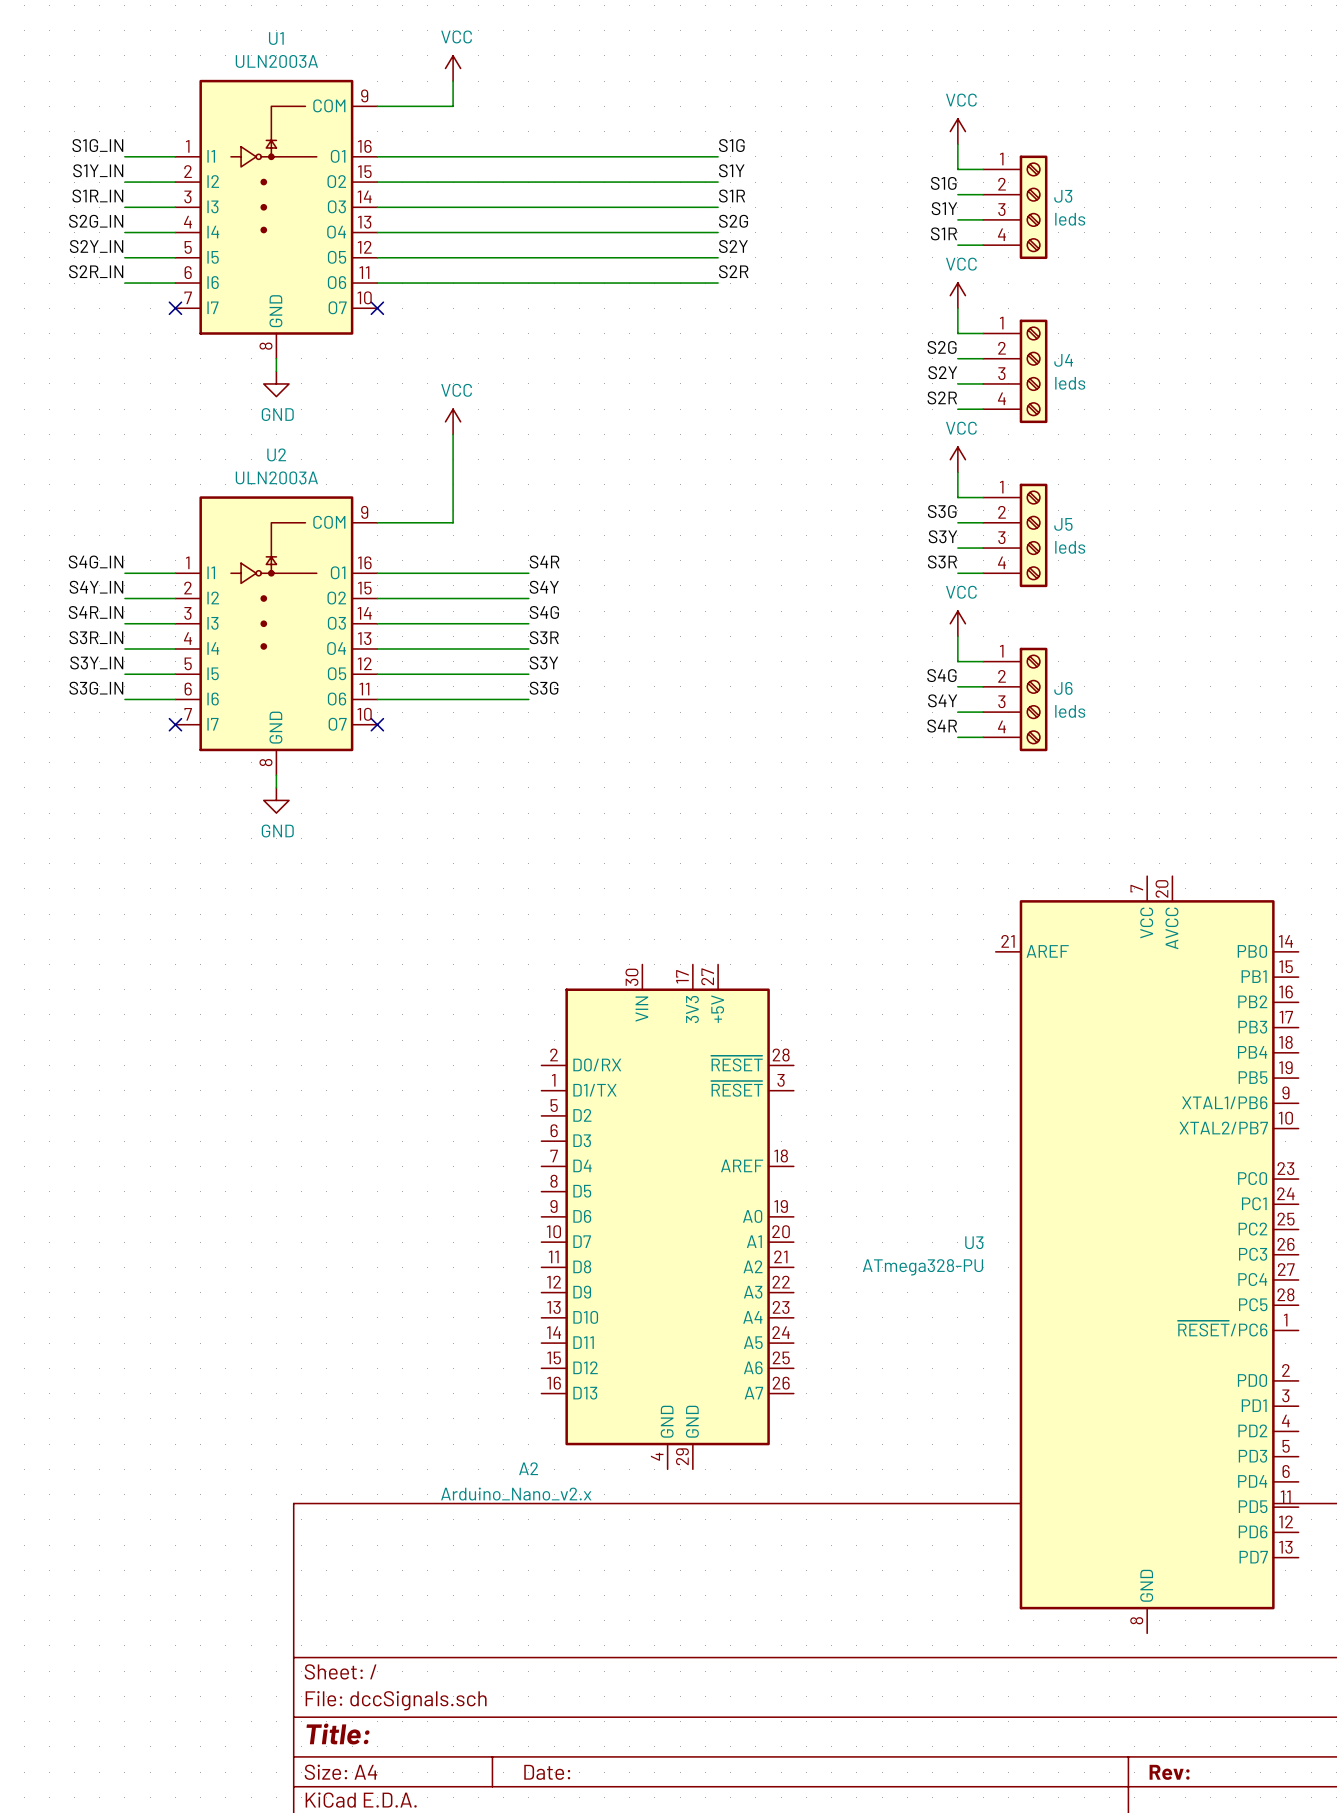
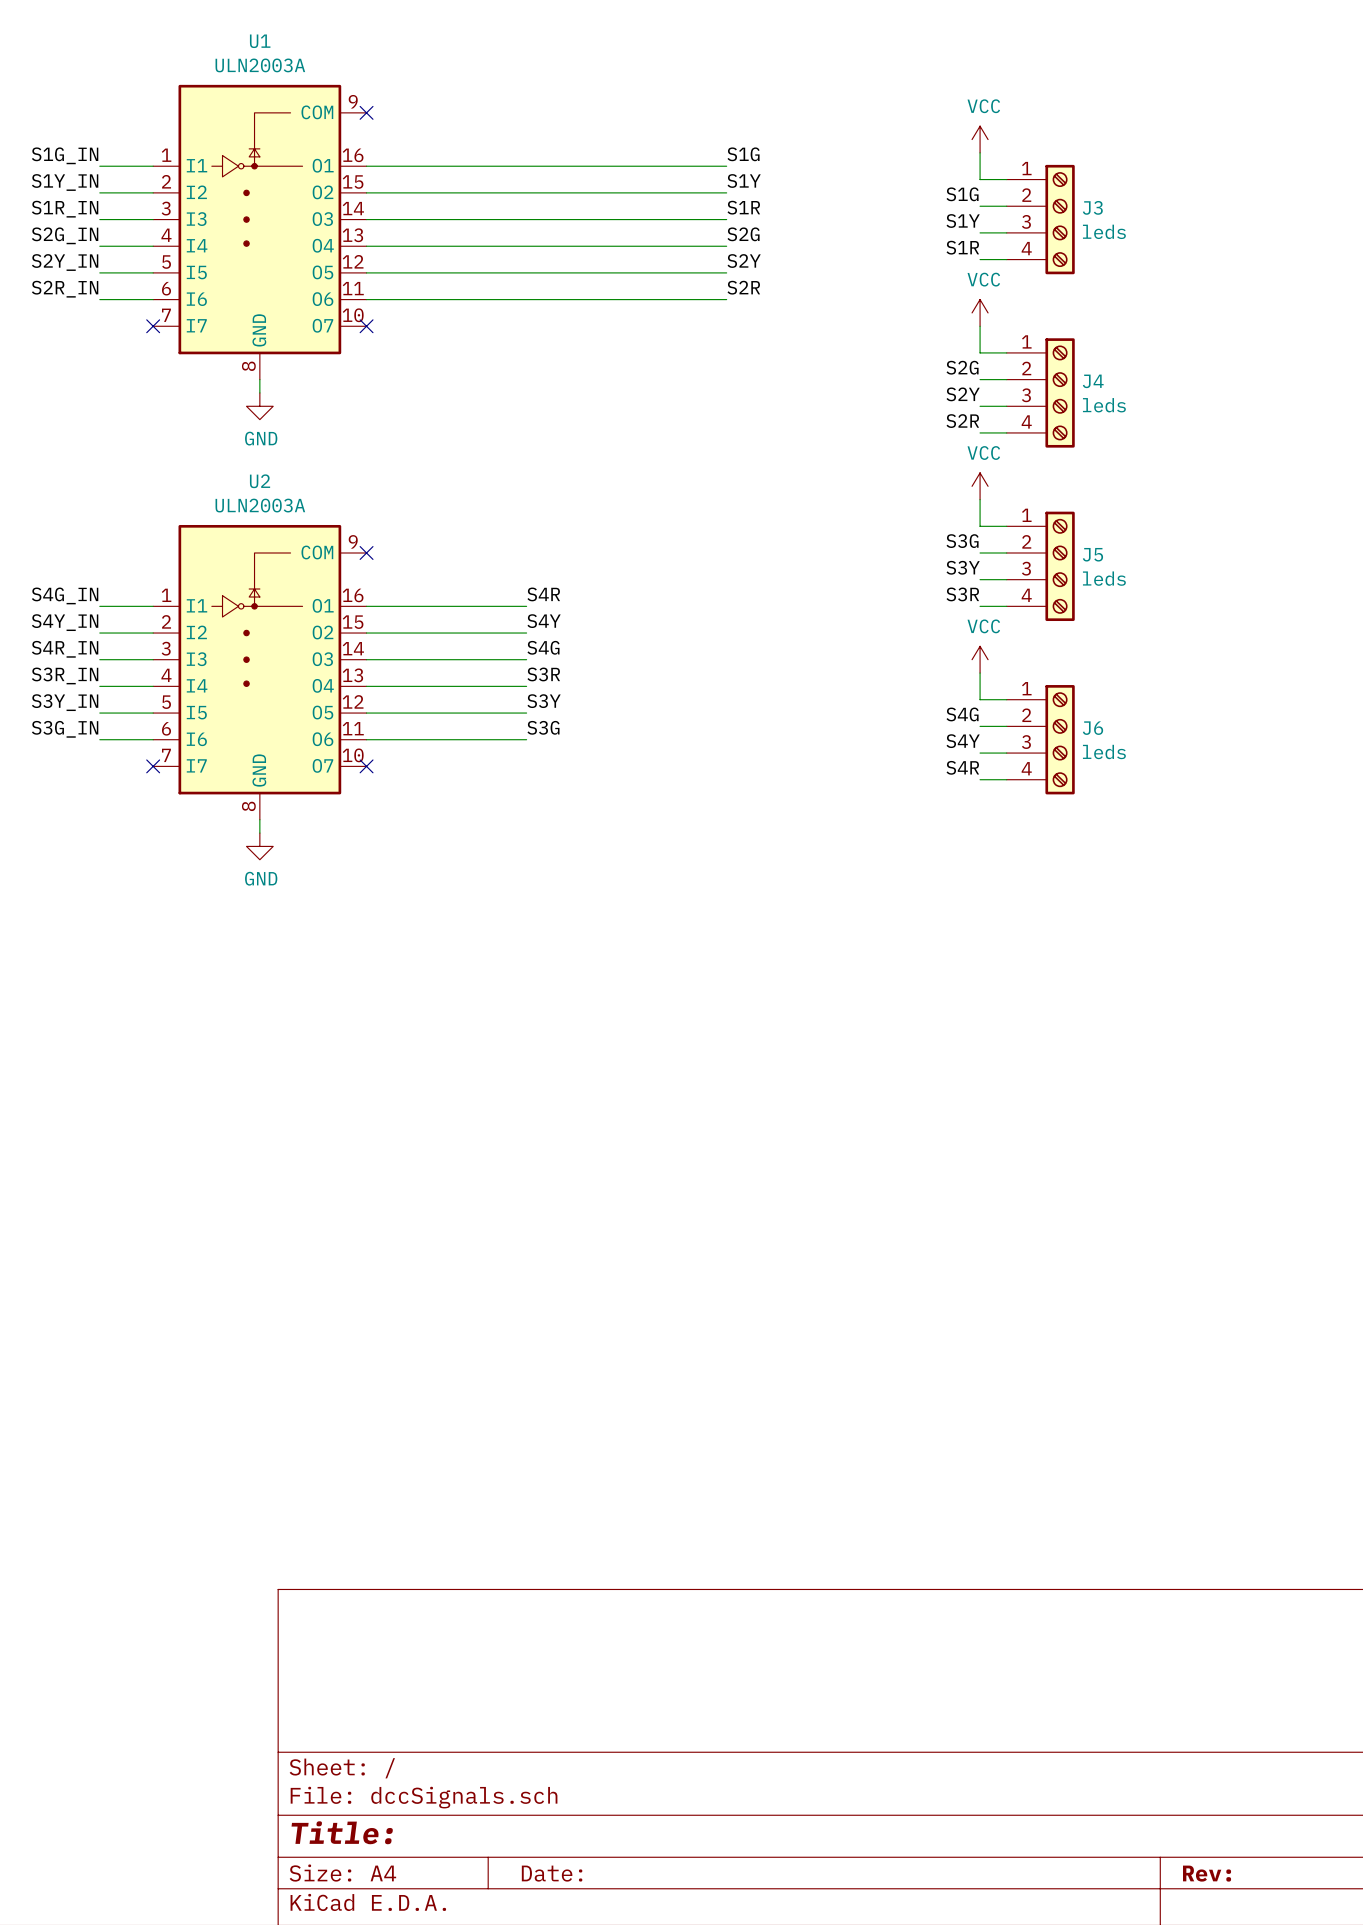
power symbol: VCC (453, 68) -> none
wire: (453, 81) (453, 106) (377, 106) -> none
no-connect mark: none -> (366, 112)
power symbol: VCC (453, 421) -> none
wire: (453, 434) (453, 522) (377, 522) -> none
no-connect mark: none -> (366, 552)
A2: Arduino_Nano_v2.x (667, 1216) -> none
U3: ATmega328-PU (1147, 1254) -> none

